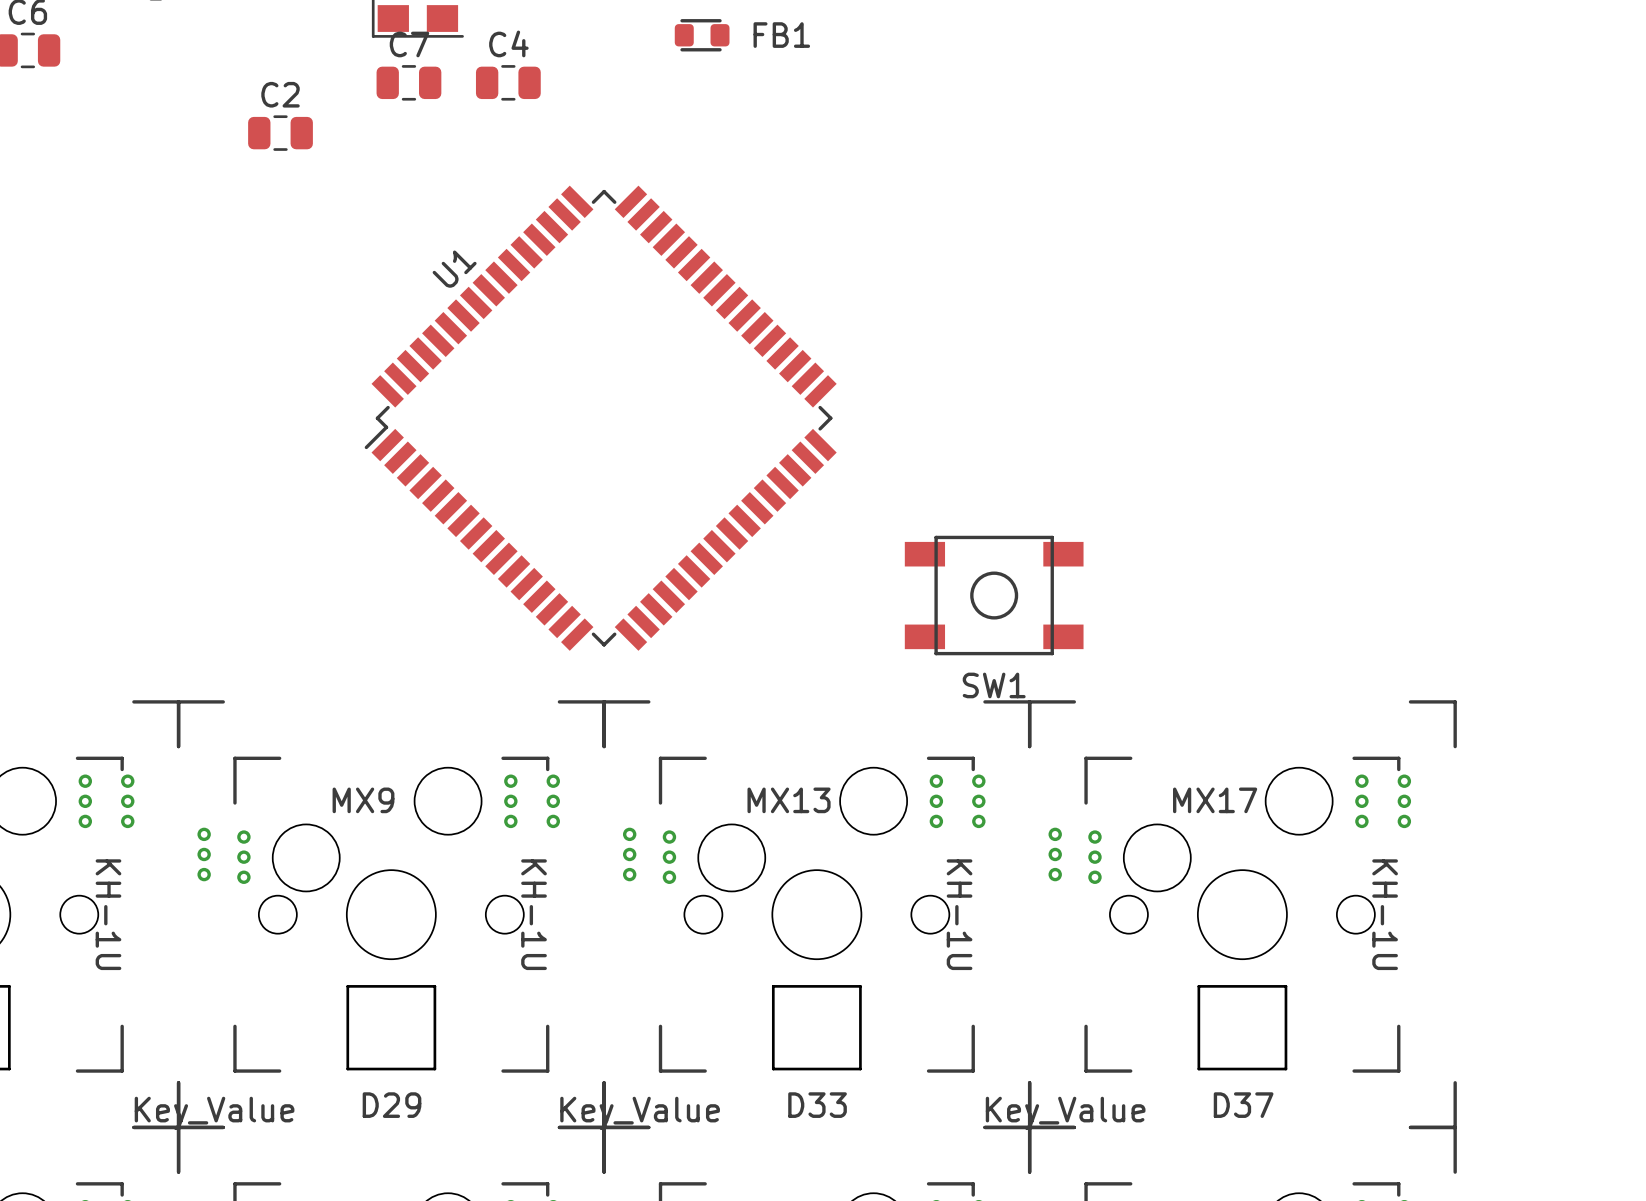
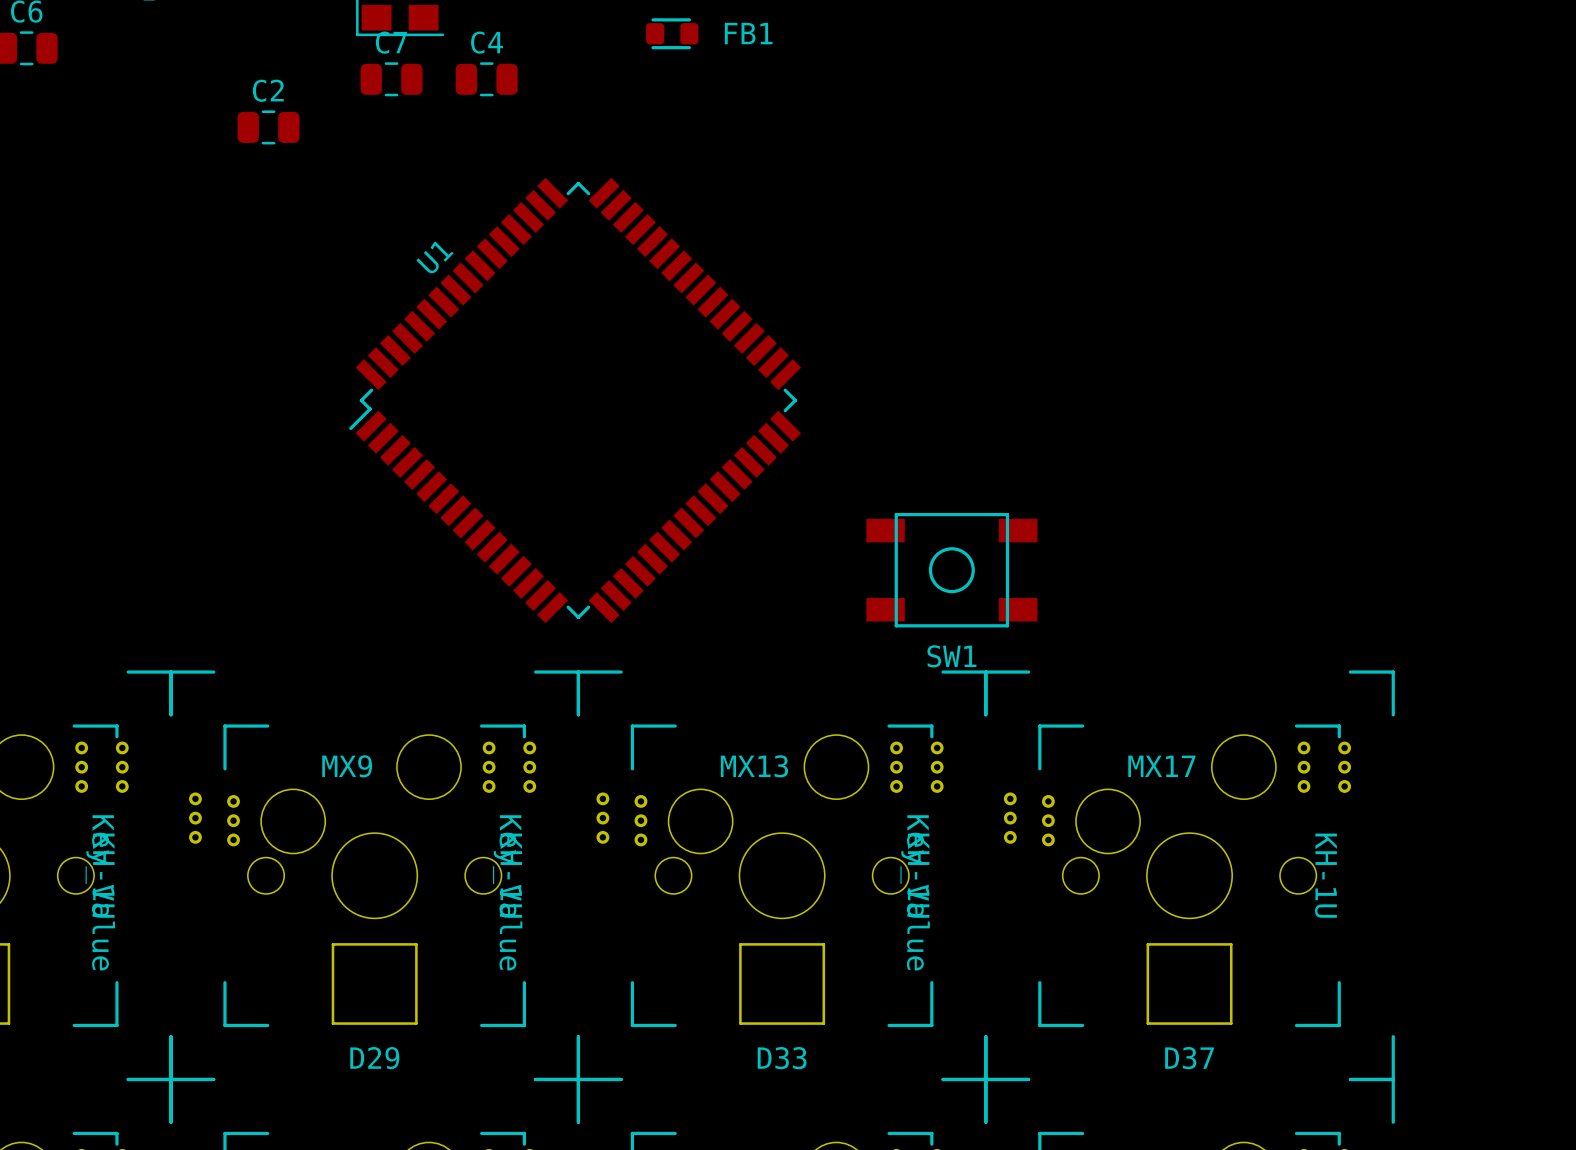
part: none -> (100, 892)
part: none -> (507, 892)
part: none -> (915, 892)
part: (214, 1113) -> none
part: (640, 1113) -> none
part: (1065, 1113) -> none

